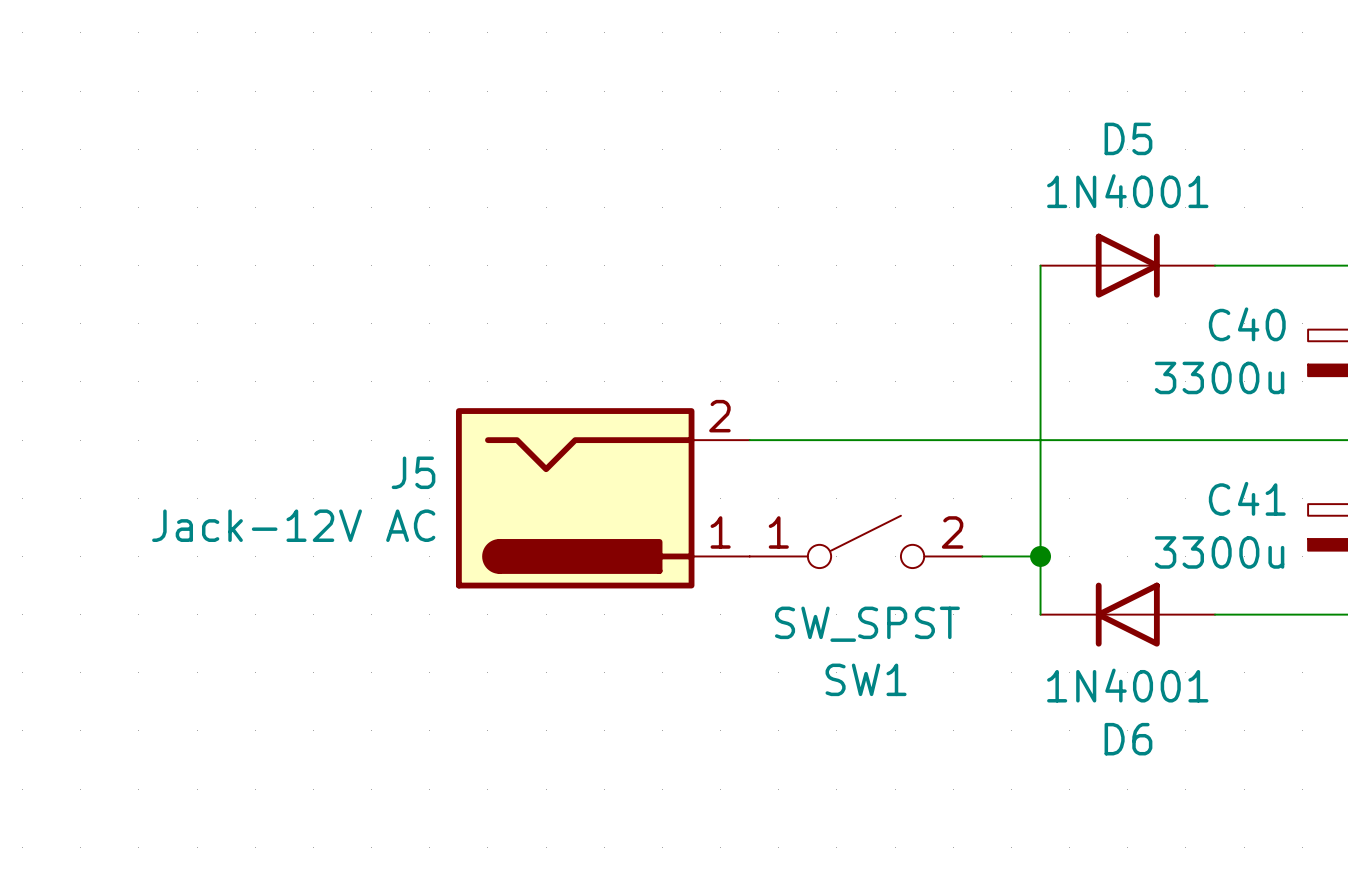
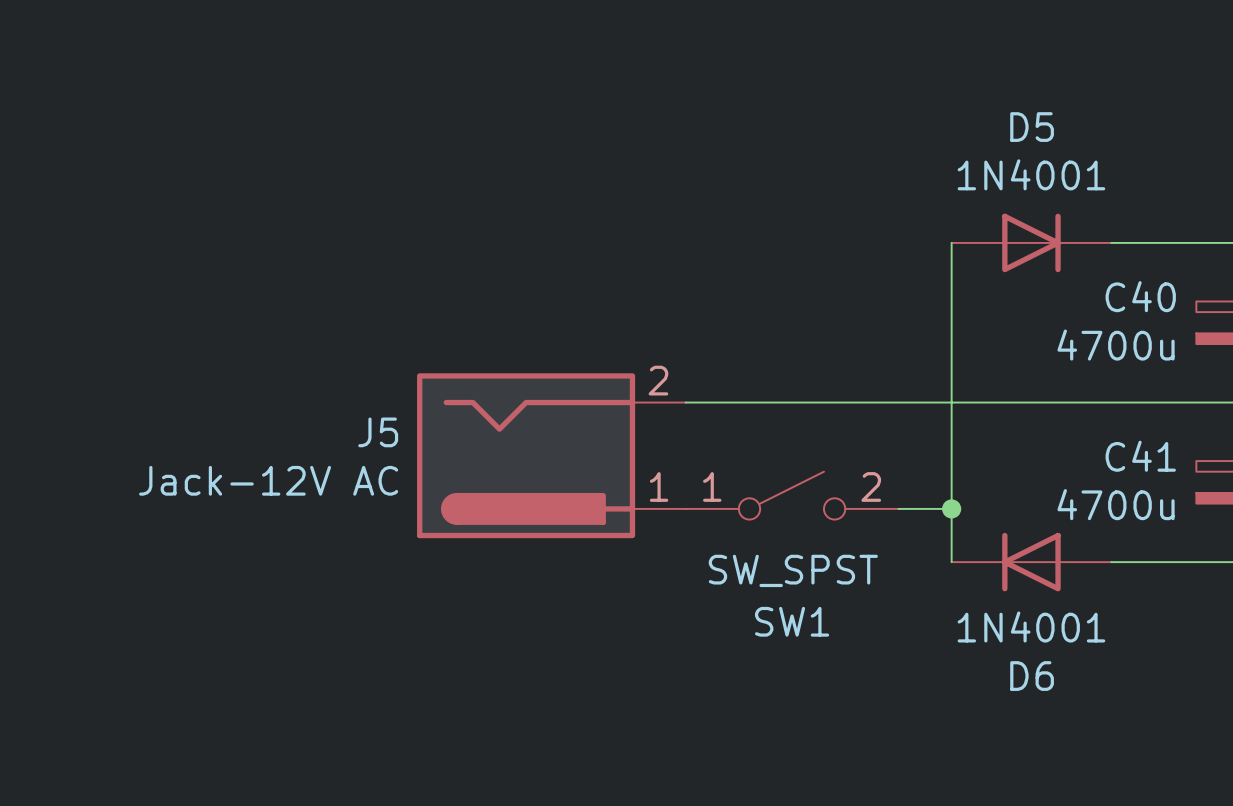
C40 value: 3300u (1219, 377) -> 4700u (1116, 345)
C41 value: 3300u (1219, 552) -> 4700u (1116, 504)

